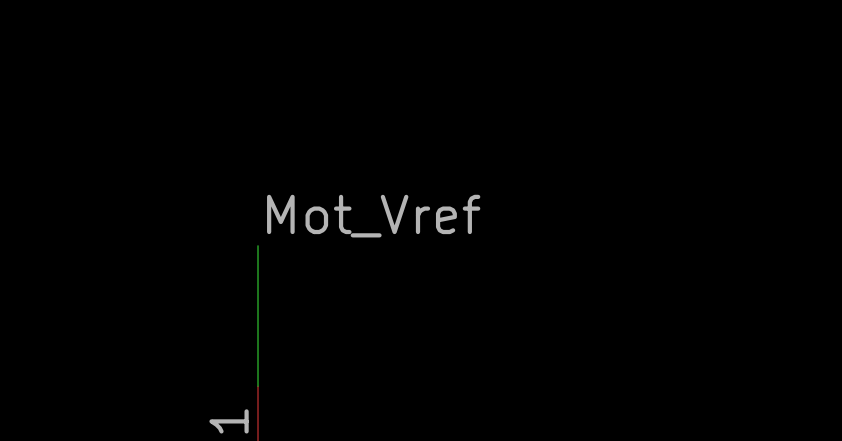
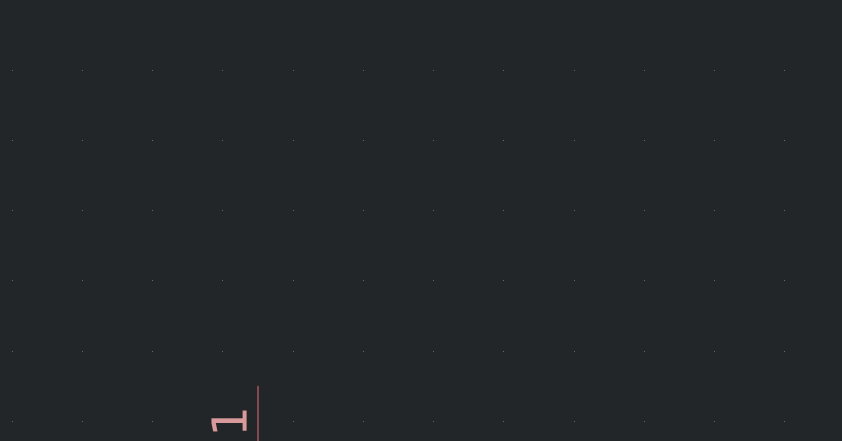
label: Mot_Vref (373, 216) -> none
wire: (258, 245) (258, 386) -> none

